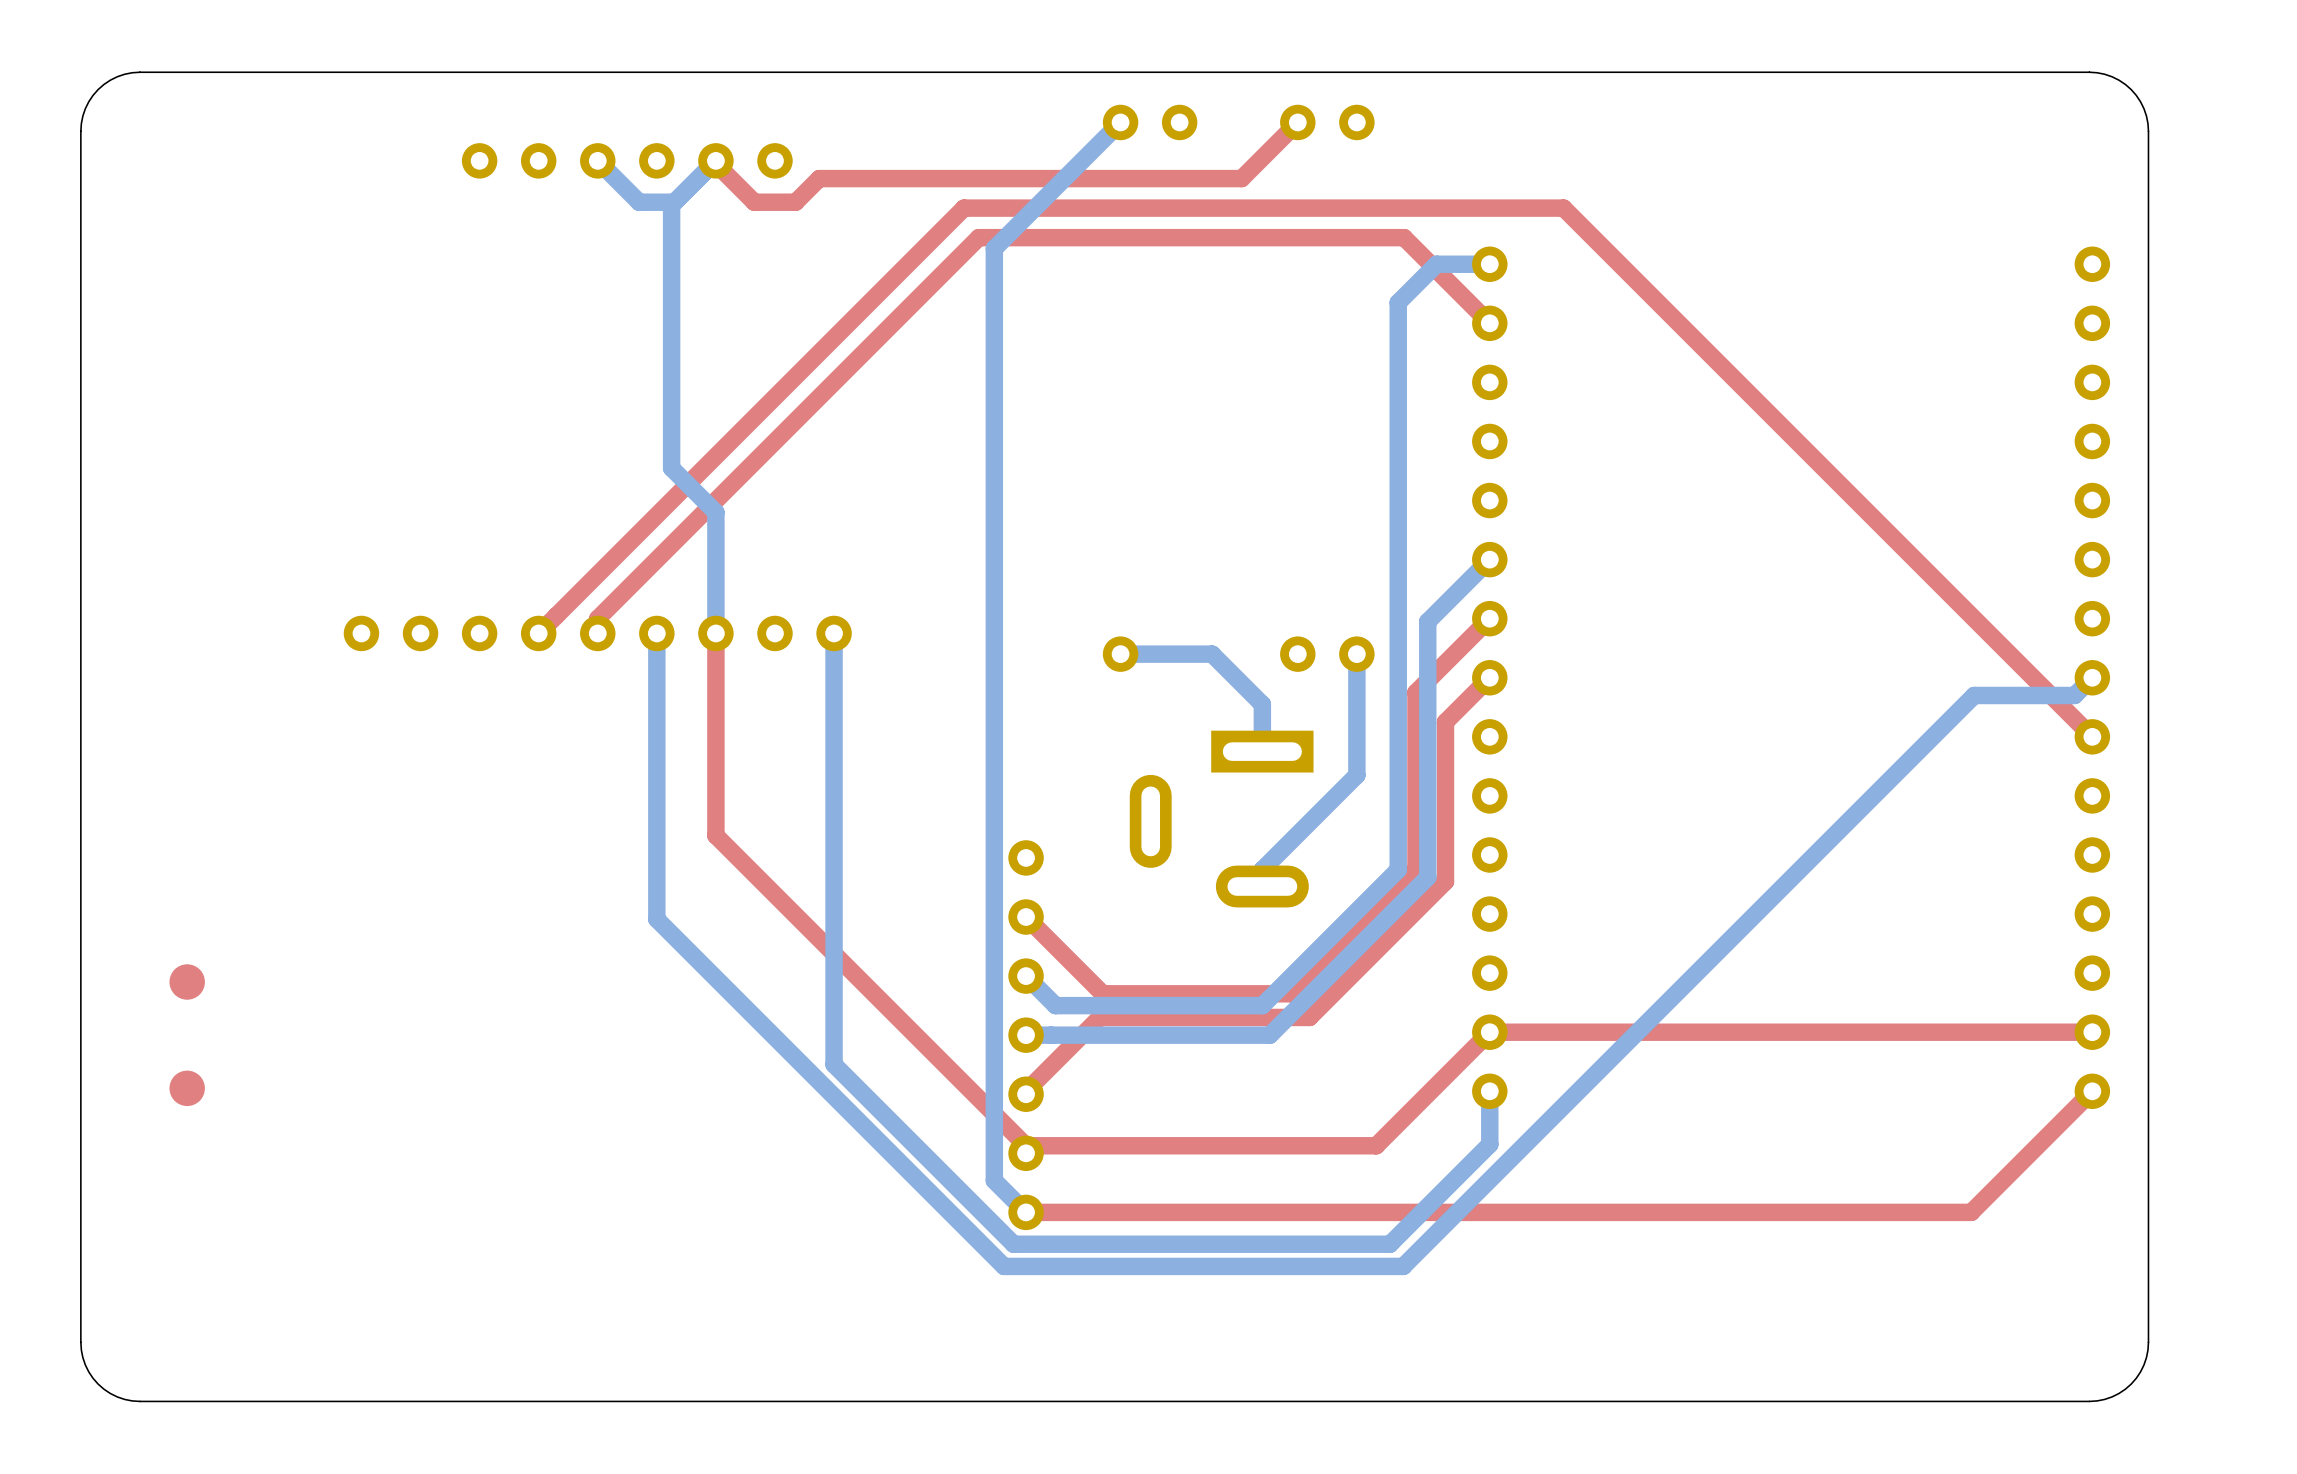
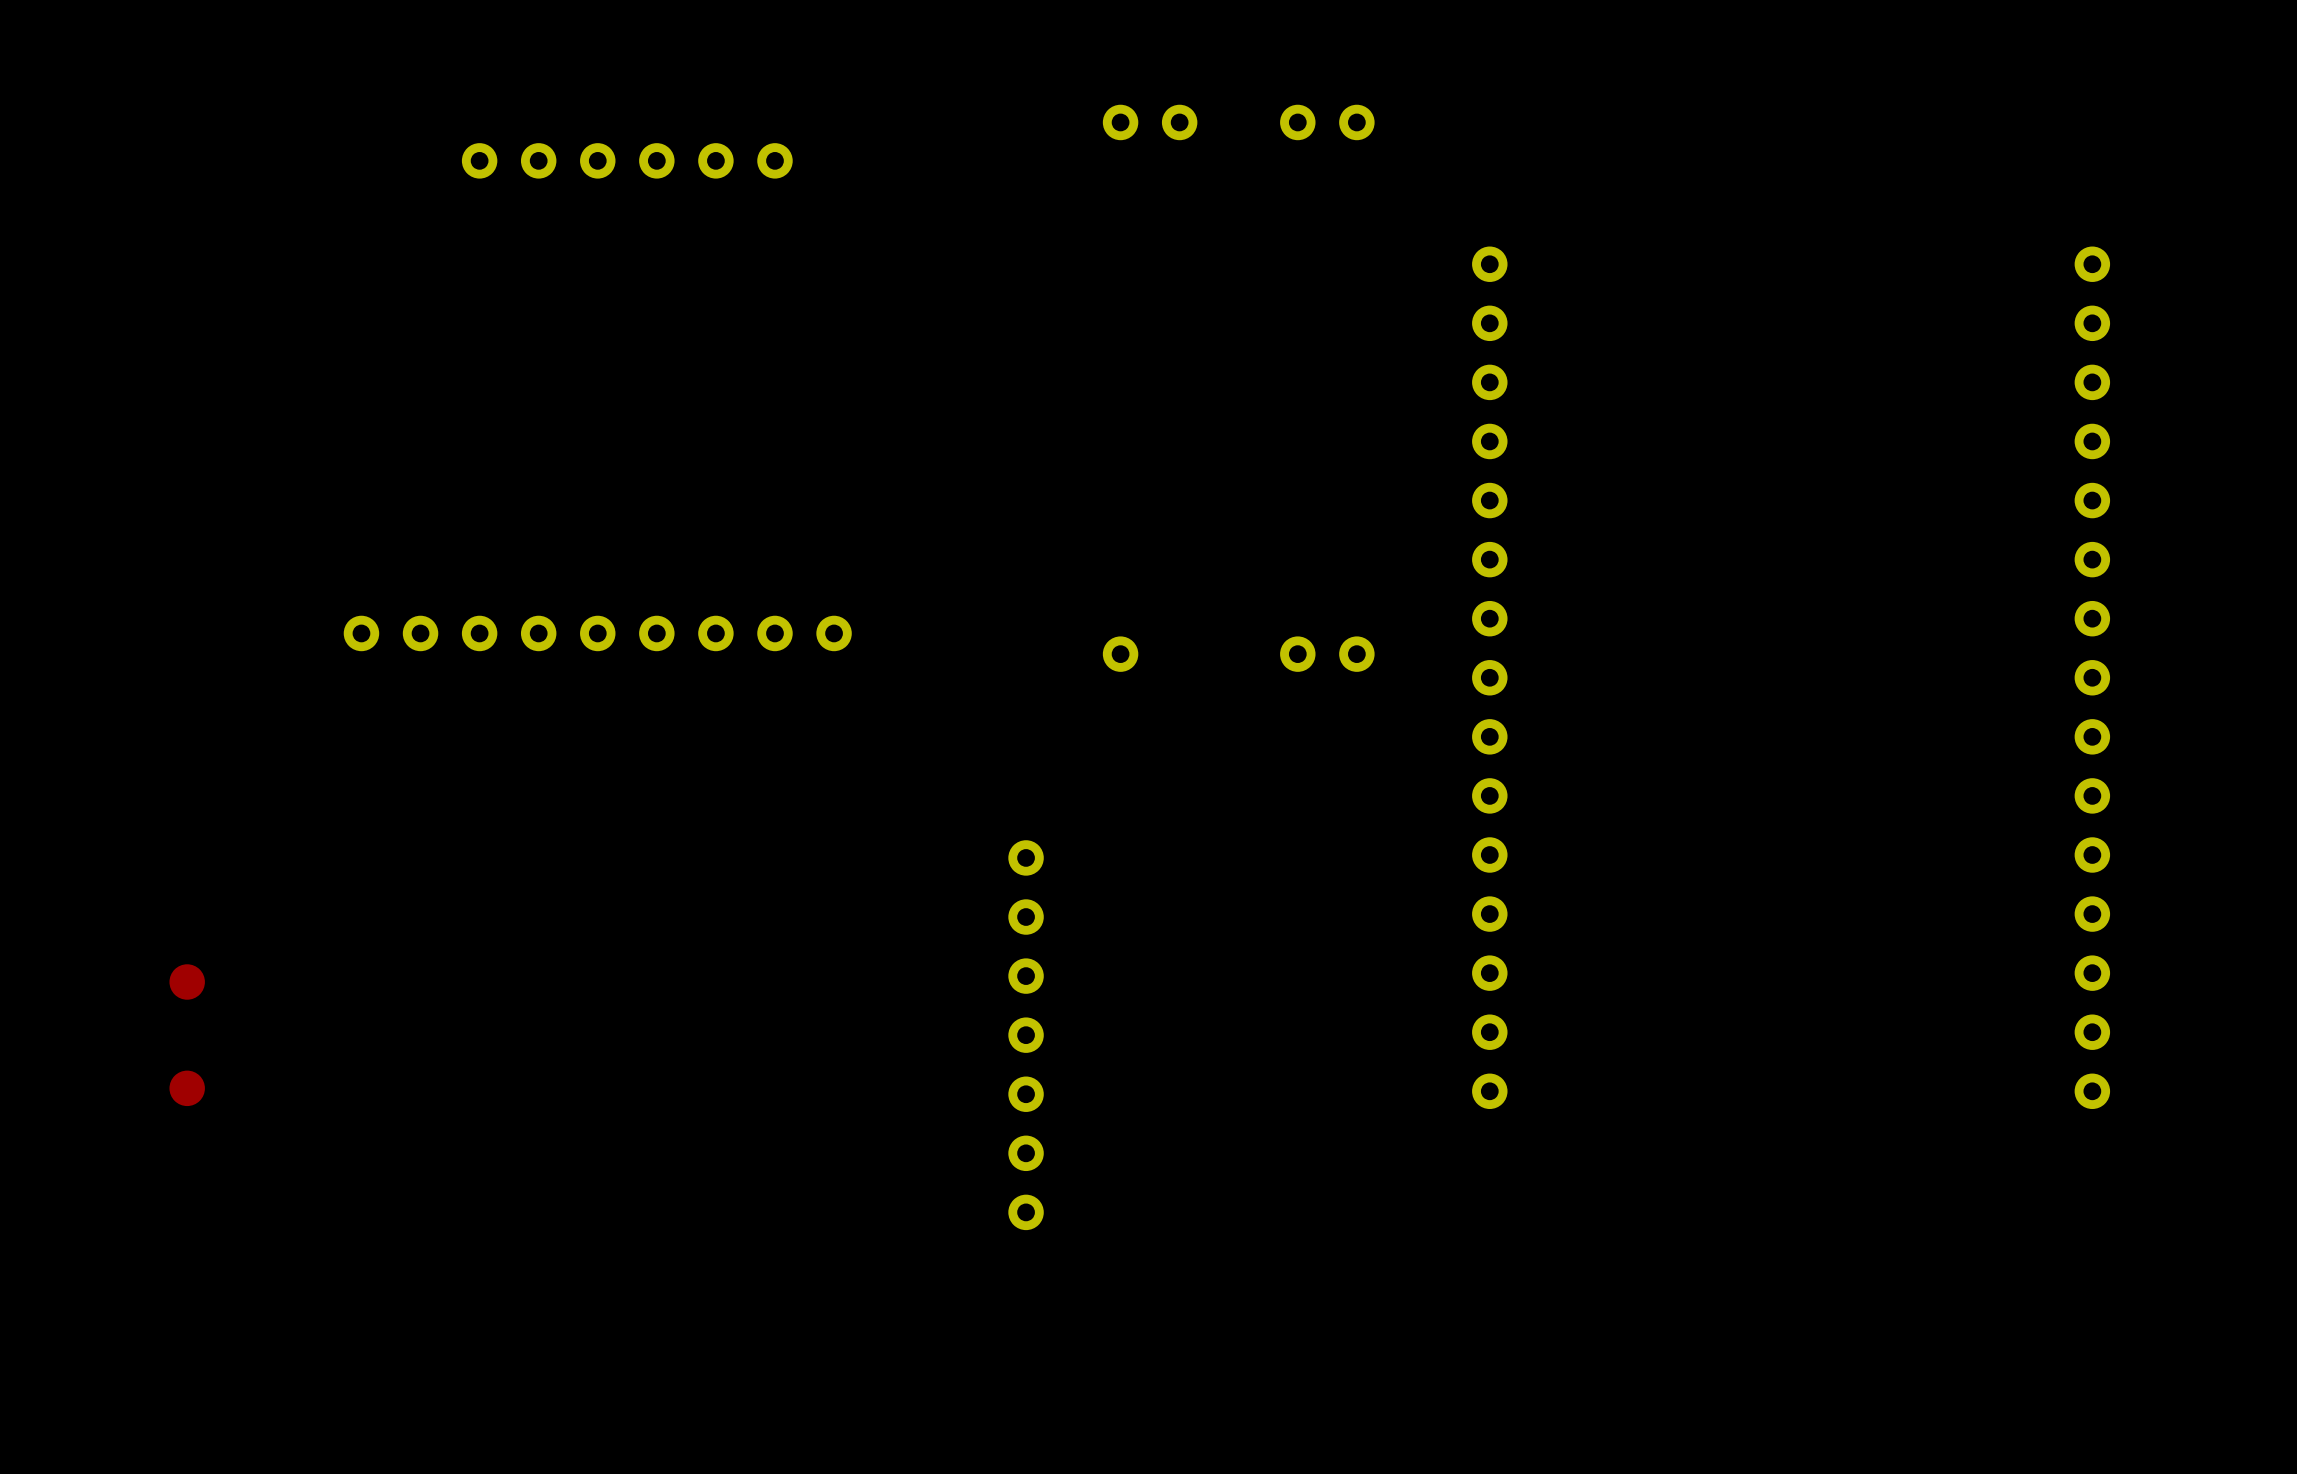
board edge: (2089, 72) (139, 72) (124, 74) (110, 80) (98, 89) (88, 101) (82, 116) (80, 131) (80, 1342) (82, 1357) (88, 1371) (98, 1384) (110, 1393) (124, 1399) (139, 1401) (2089, 1401) (2104, 1399) (2118, 1393) (2131, 1384) (2140, 1371) (2146, 1357) (2148, 1342) (2148, 131) (2143, 108) (2131, 89) (2112, 76) (2089, 72) -> none
bottom track: (1120, 122) (994, 248) (994, 1180) (1026, 1212) -> none
top track: (1297, 122) (1241, 178) (819, 178) (795, 202) (754, 202) (715, 163) (715, 160) -> none
bottom track: (597, 160) (639, 202) (674, 202) -> none
bottom track: (715, 160) (671, 205) (671, 468) (715, 512) (715, 633) -> none
bottom track: (1489, 264) (1436, 264) (1398, 302) (1398, 869) (1262, 1005) (1055, 1005) (1026, 976) -> none
top track: (1489, 323) (1404, 237) (978, 237) (597, 618) (597, 633) -> none
bottom track: (1489, 559) (1427, 621) (1427, 877) (1269, 1035) (1026, 1035) -> none
top track: (1489, 618) (1415, 692) (1415, 869) (1291, 993) (1102, 993) (1026, 917) -> none
top track: (538, 633) (964, 208) (1563, 208) (2092, 736) -> none
bottom track: (656, 633) (656, 919) (1004, 1266) (1403, 1266) (1974, 695) (2074, 695) (2092, 677) -> none
top track: (715, 633) (715, 835) (1026, 1145) -> none
bottom track: (834, 633) (834, 1064) (1013, 1244) (1390, 1244) (1489, 1144) (1489, 1091) -> none
bottom track: (1120, 654) (1212, 654) (1262, 704) (1262, 751) -> none
bottom track: (1356, 654) (1356, 775) (1262, 869) (1262, 886) -> none
top track: (1489, 677) (1445, 722) (1445, 881) (1309, 1017) (1099, 1017) (1026, 1091) (1026, 1094) -> none
part: (1221, 819) -> none
top track: (2092, 1032) (1489, 1032) (1376, 1145) (1026, 1145) -> none
top track: (2092, 1091) (1971, 1212) (1026, 1212) -> none

